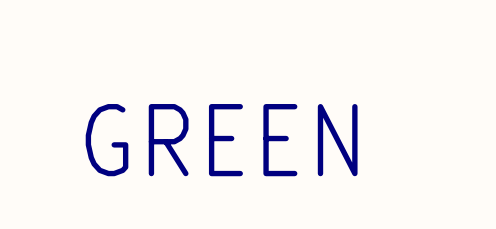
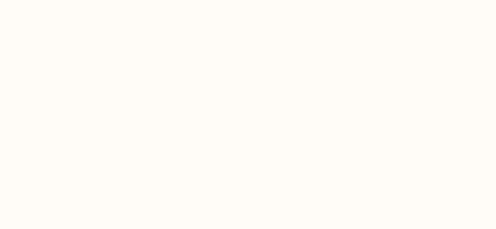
text: GREEN (221, 140) -> none

